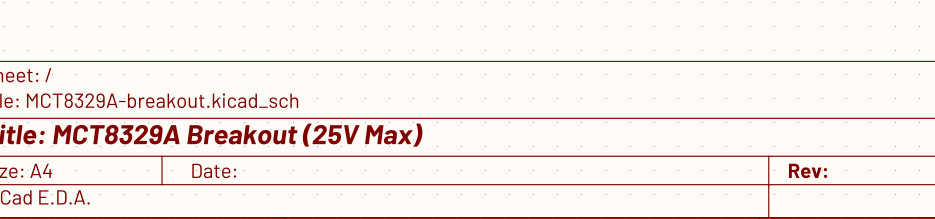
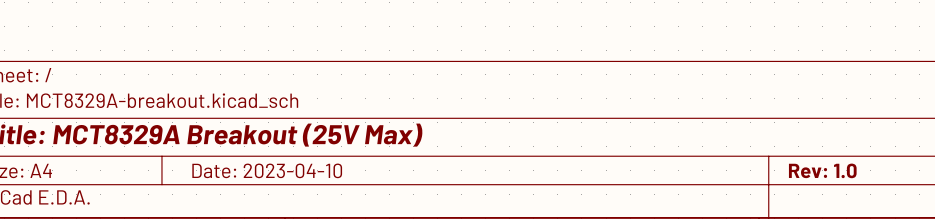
title block: Date: (214, 170) -> Date: 2023-04-10 (267, 170)
title block: Rev: (808, 170) -> Rev: 1.0 (822, 170)

